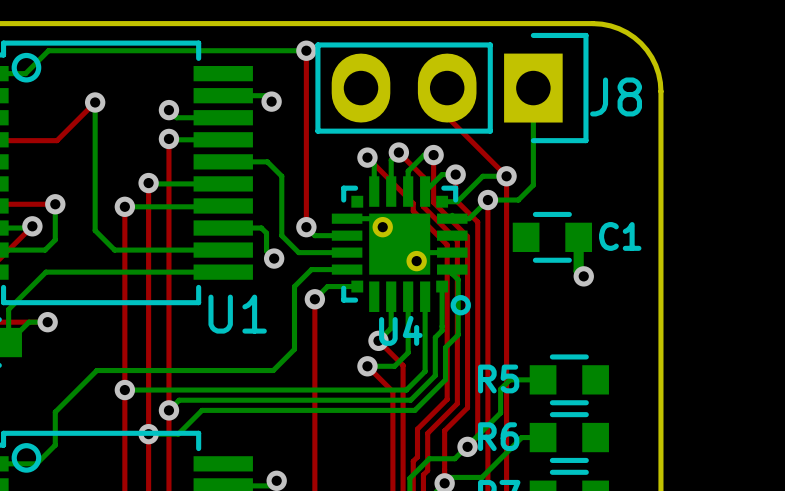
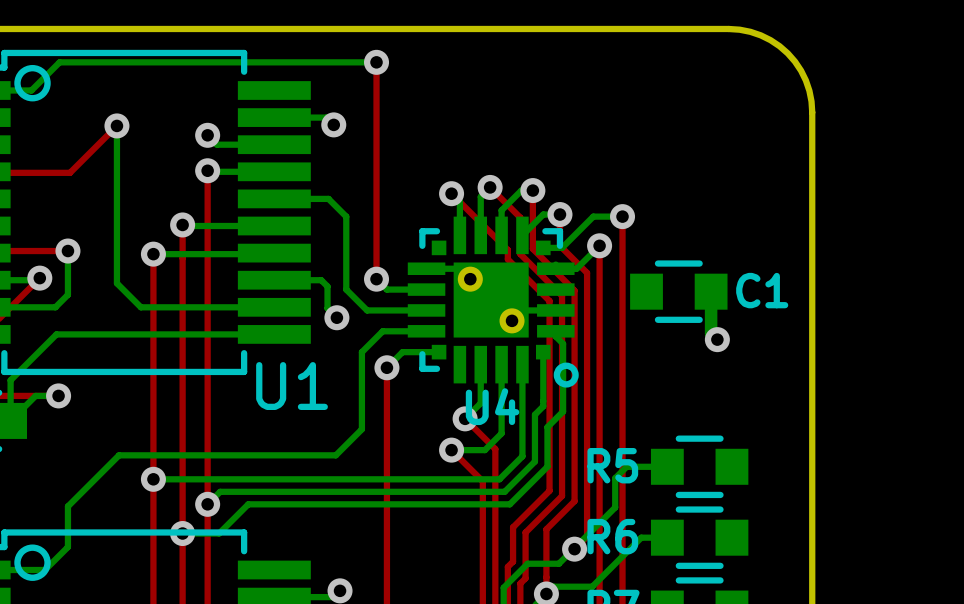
top track: (447, 88) (447, 116) (506, 176) -> none
J8: (451, 88) -> none
bottom track: (533, 88) (533, 185) (518, 200) (487, 200) -> none

